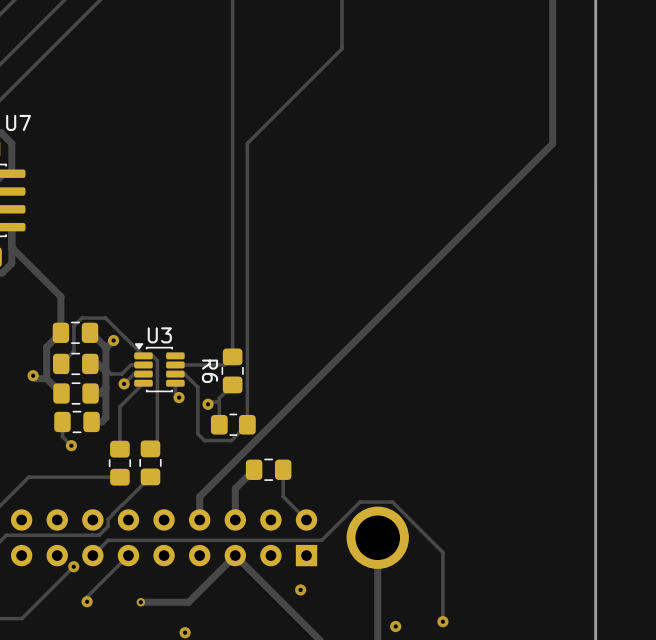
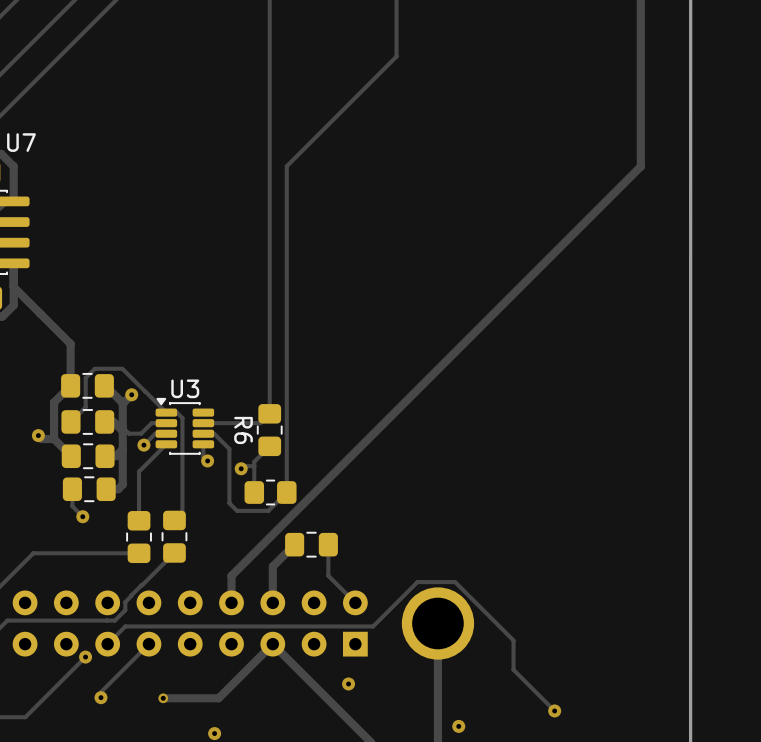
track: (442, 577) (442, 621) -> (513, 669) (554, 710)
via position: (442, 621) -> (554, 710)

